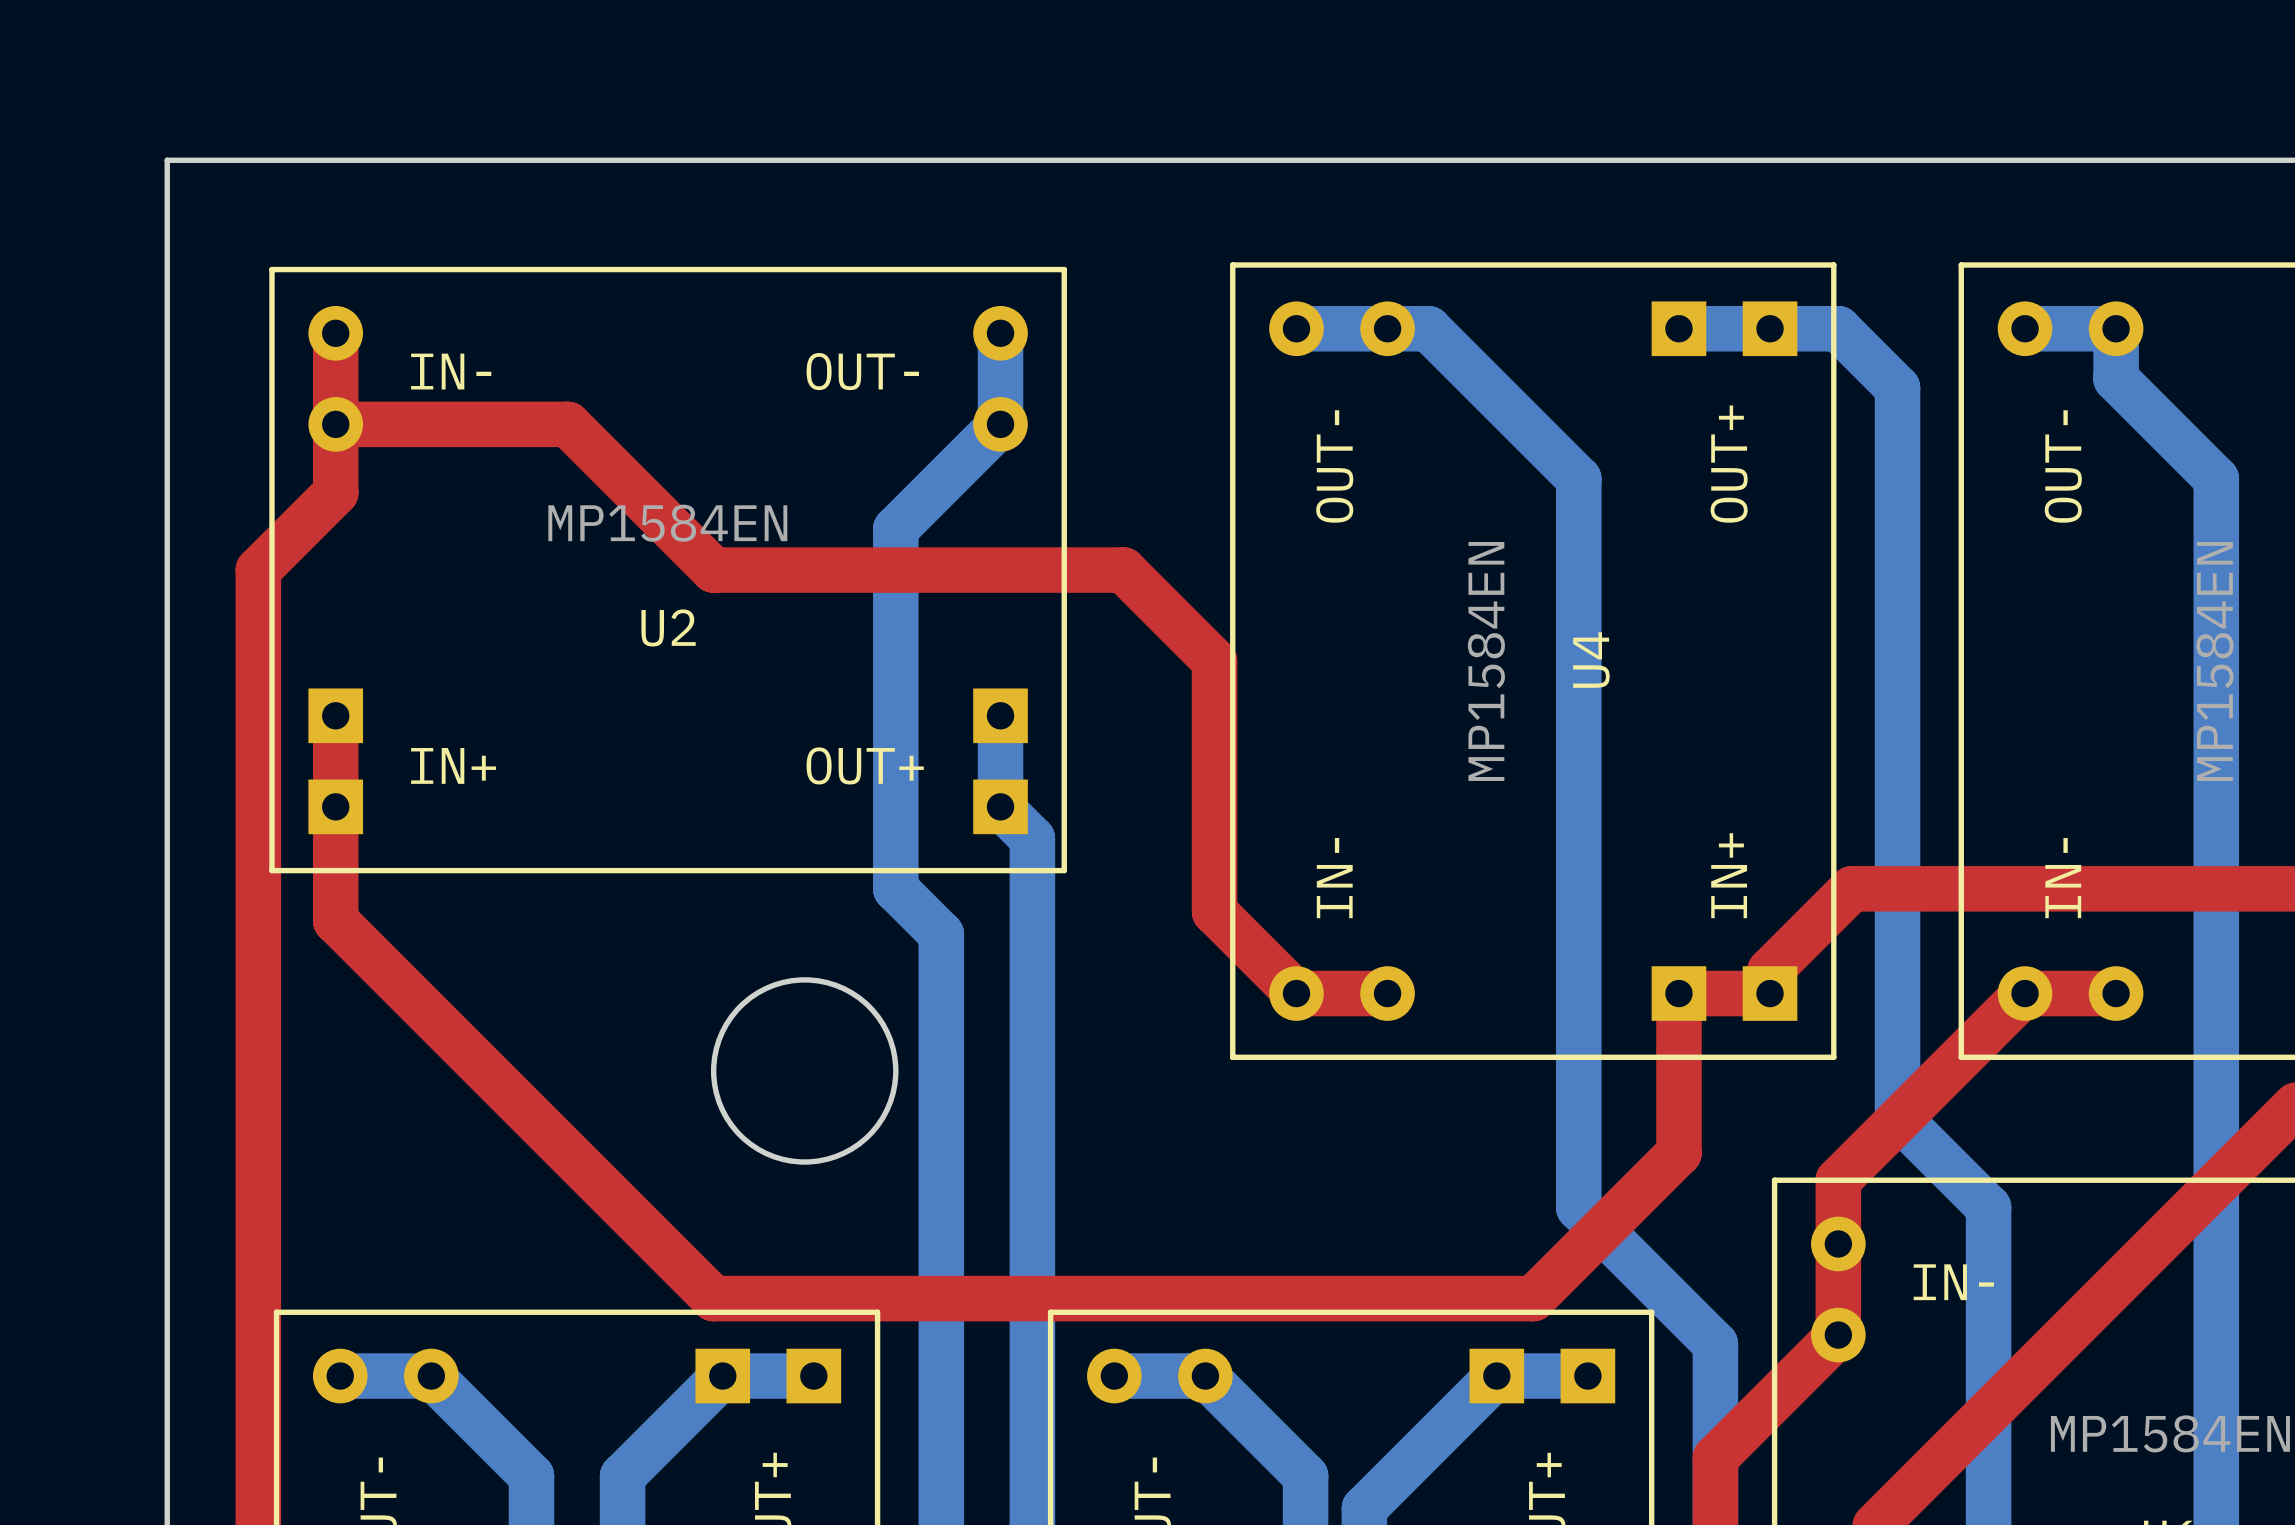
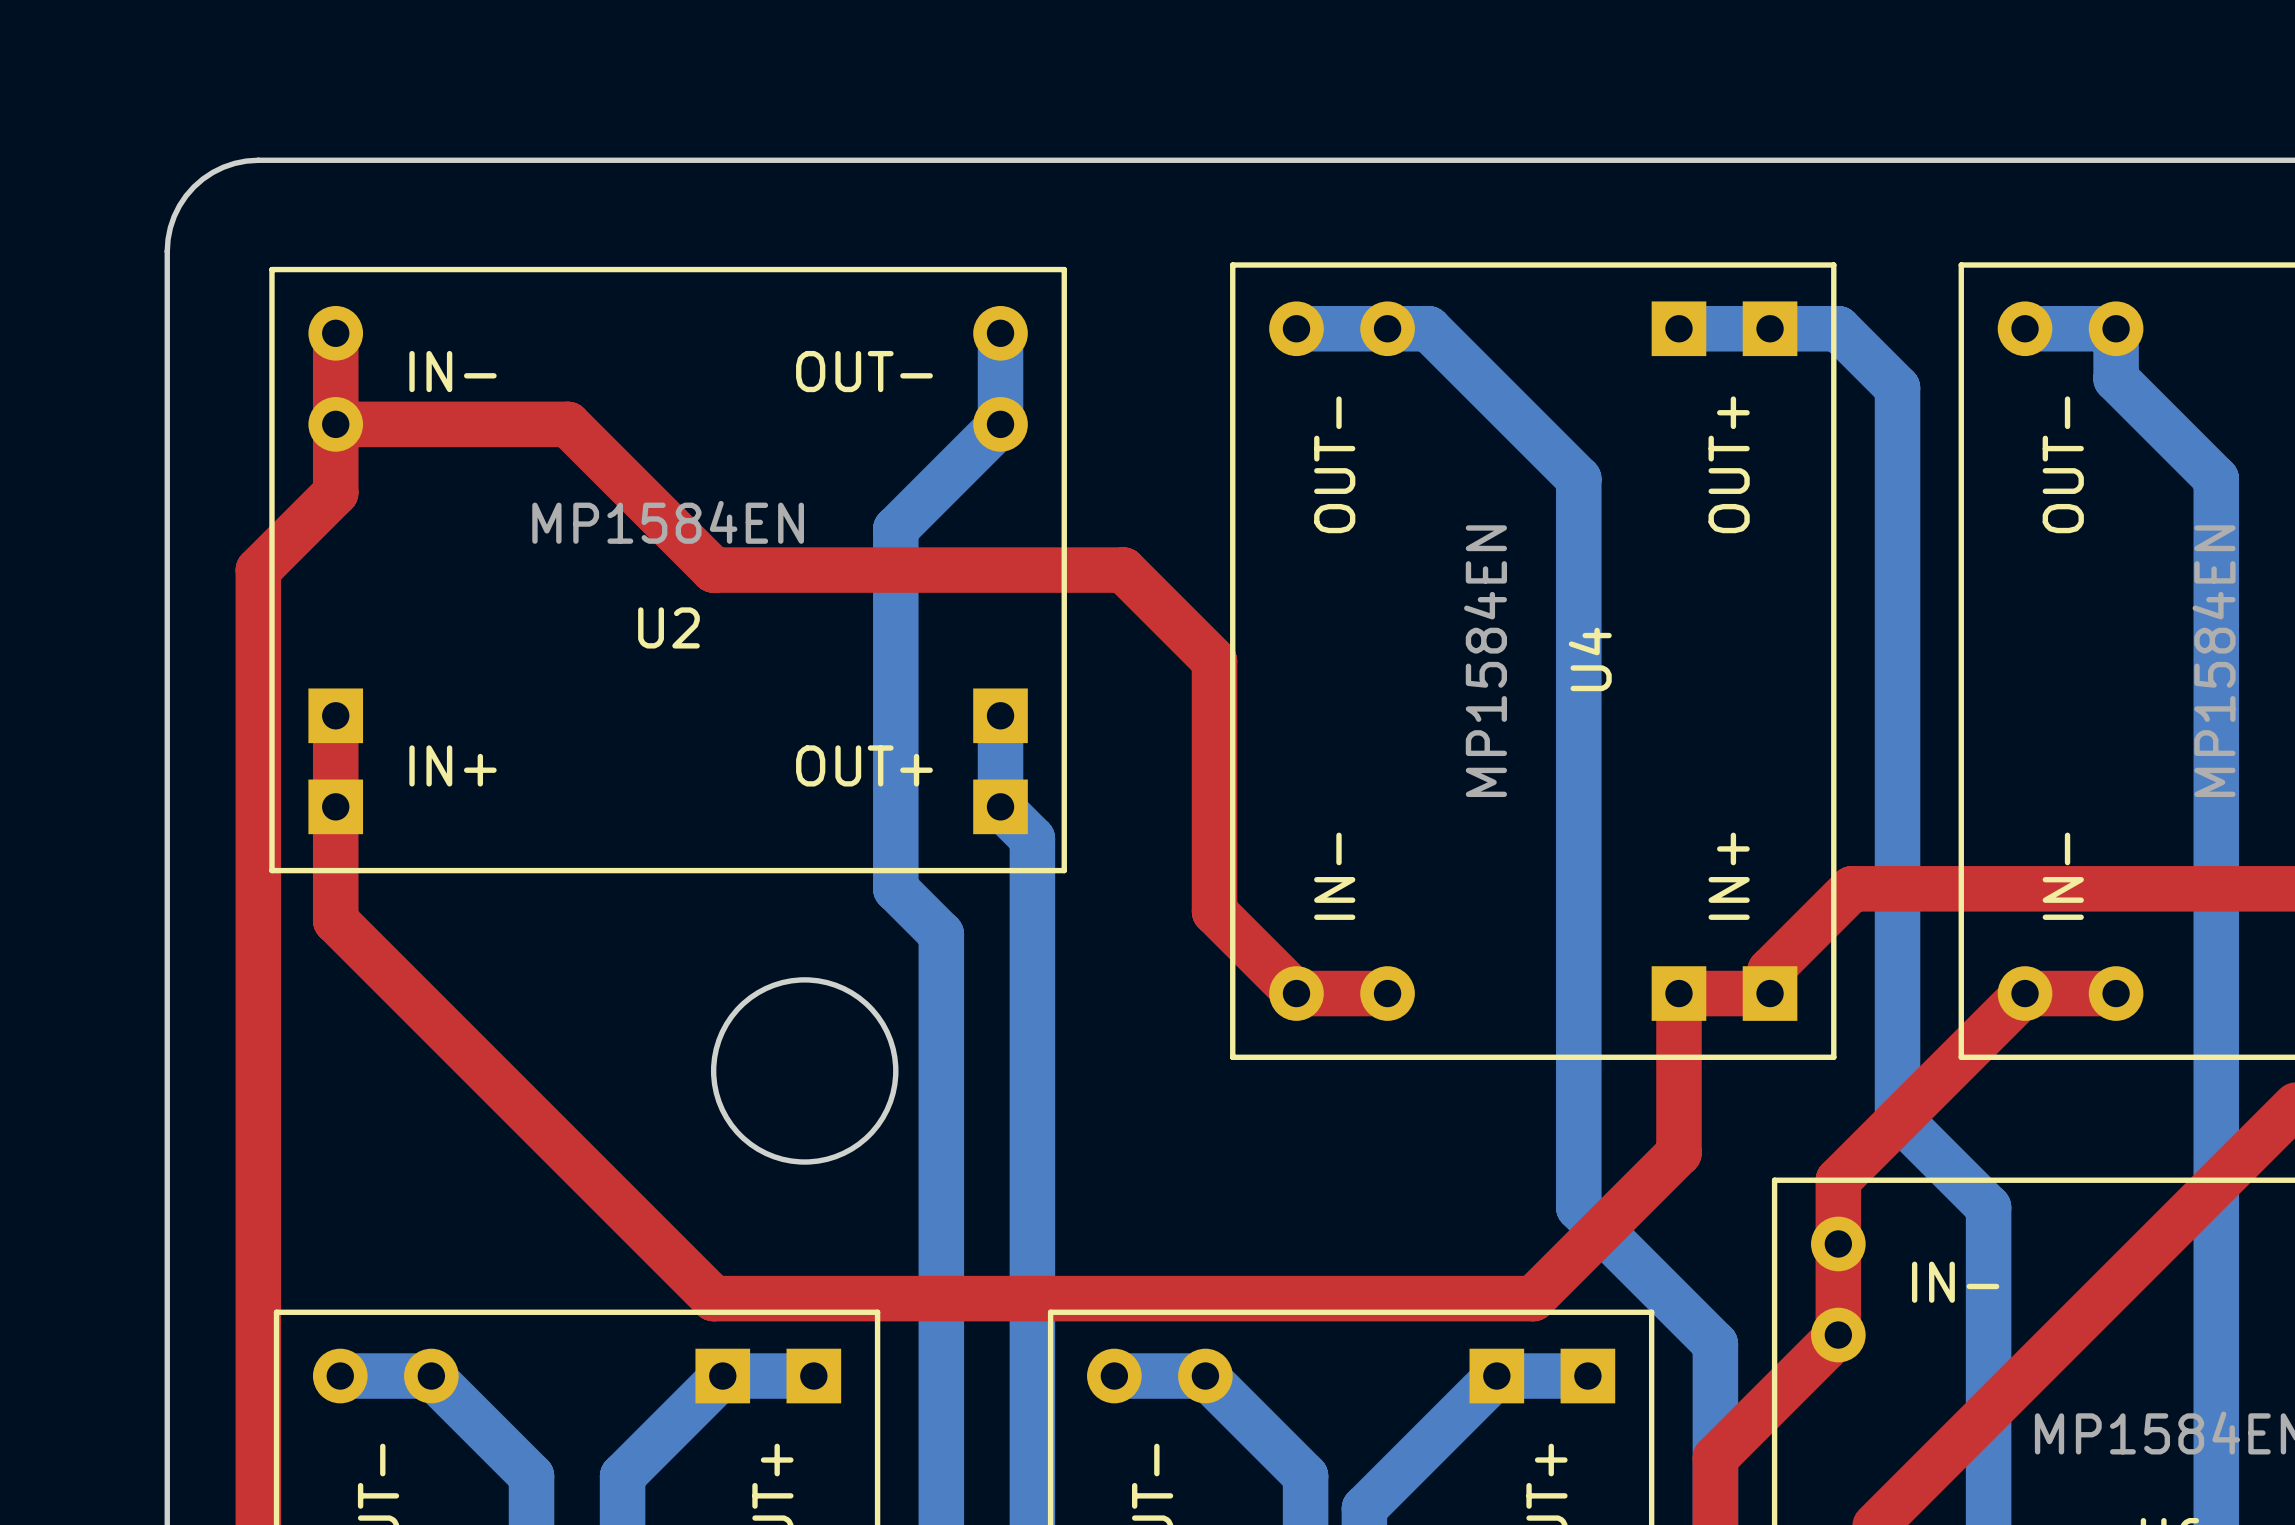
board edge: (258, 160) (167, 160) (167, 251) -> (258, 160) (246, 161) (223, 167) (212, 172) (193, 186) (179, 205) (174, 216) (170, 227) (167, 251)

